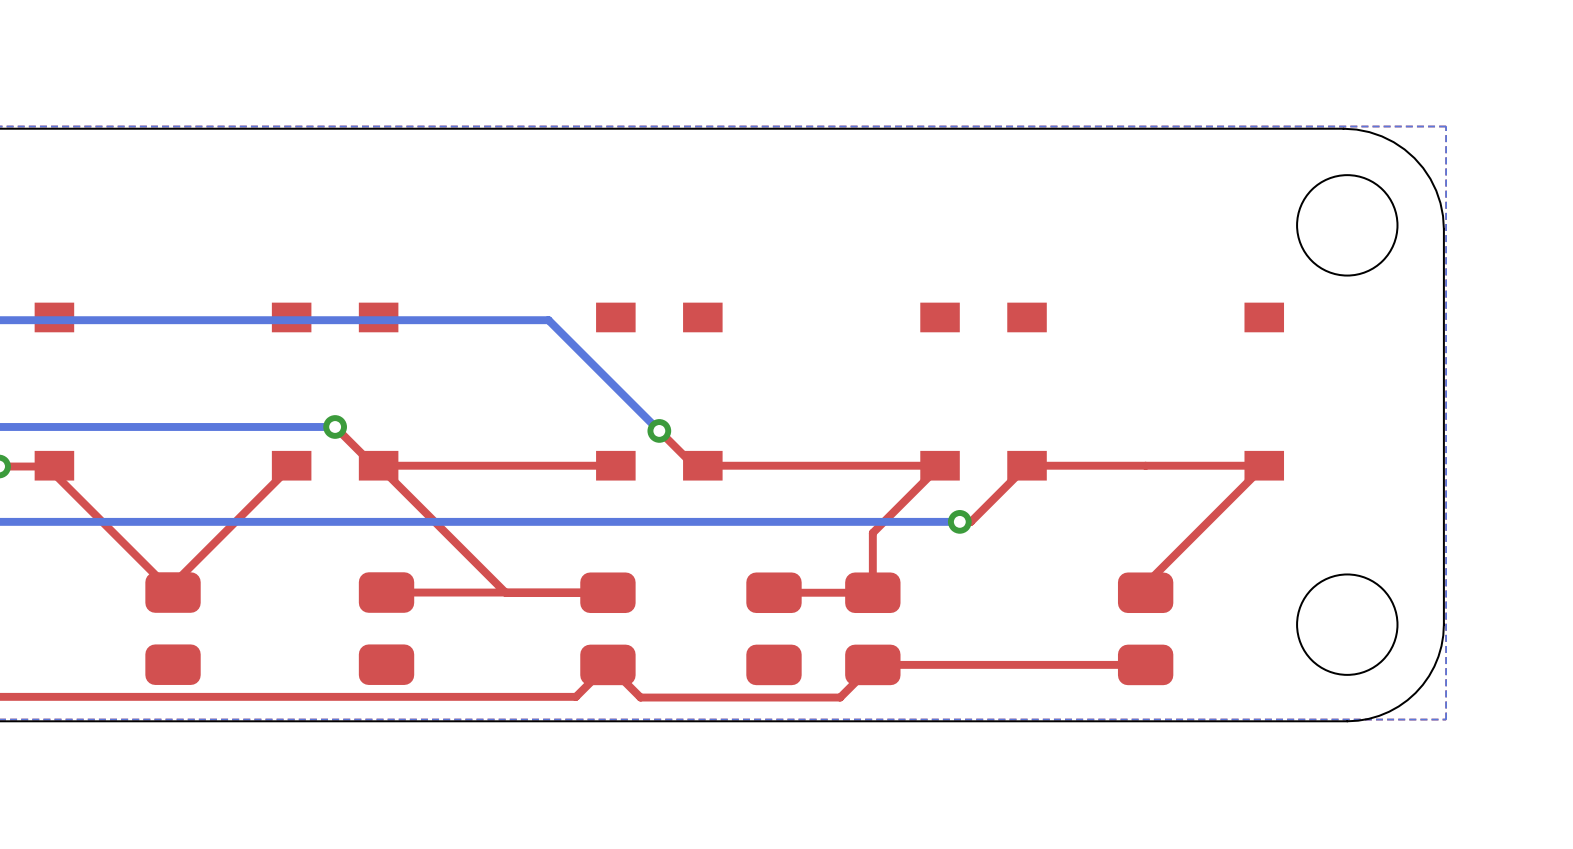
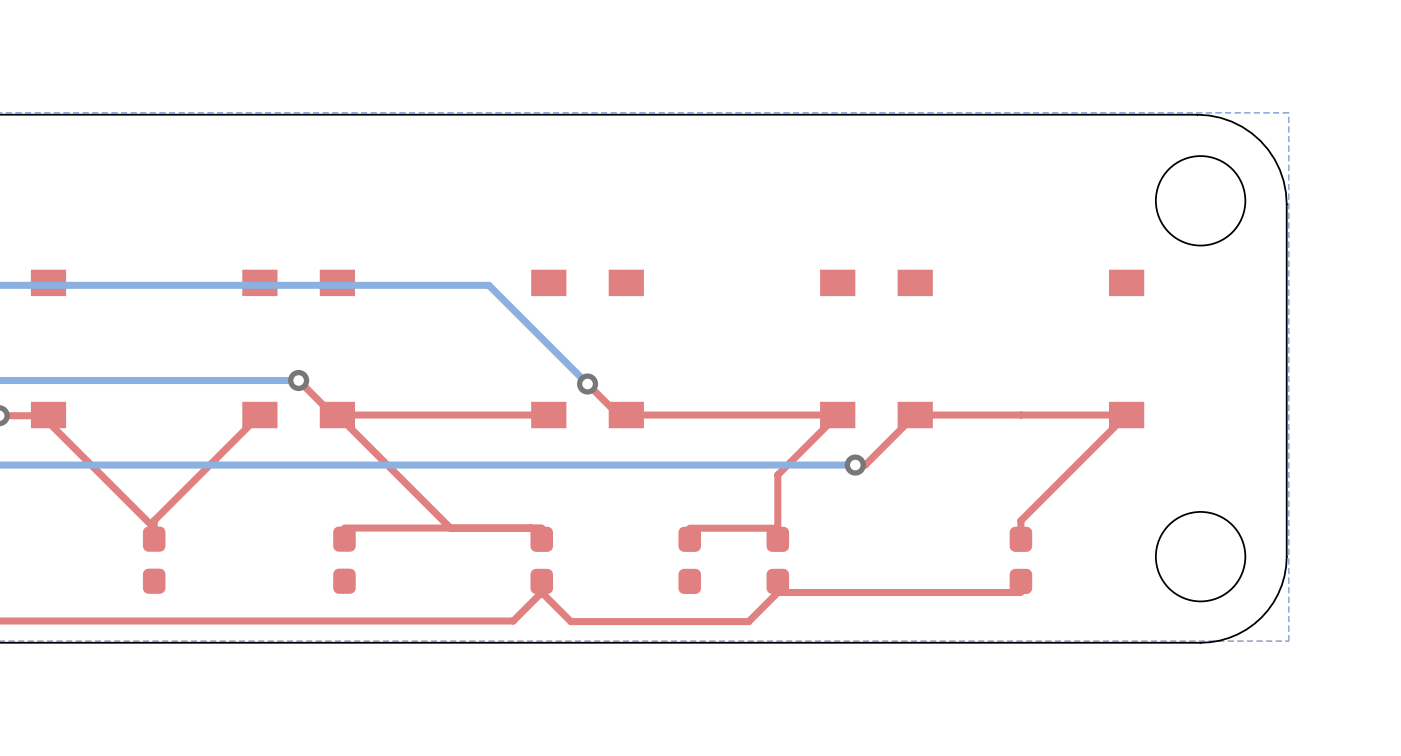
part footprint: [145, 572, 201, 685] -> [142, 526, 166, 594]
part footprint: [358, 572, 415, 685] -> [333, 526, 356, 594]
part footprint: [580, 572, 636, 686] -> [530, 526, 554, 595]
part footprint: [746, 572, 802, 686] -> [678, 526, 702, 595]
part footprint: [845, 572, 901, 686] -> [766, 526, 790, 595]
part footprint: [1117, 572, 1174, 686] -> [1009, 526, 1033, 595]

